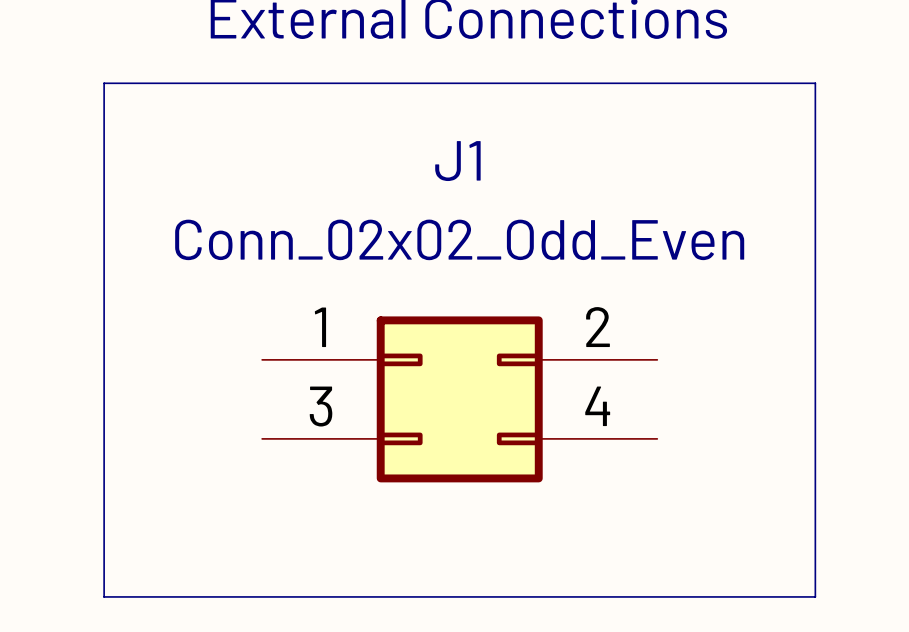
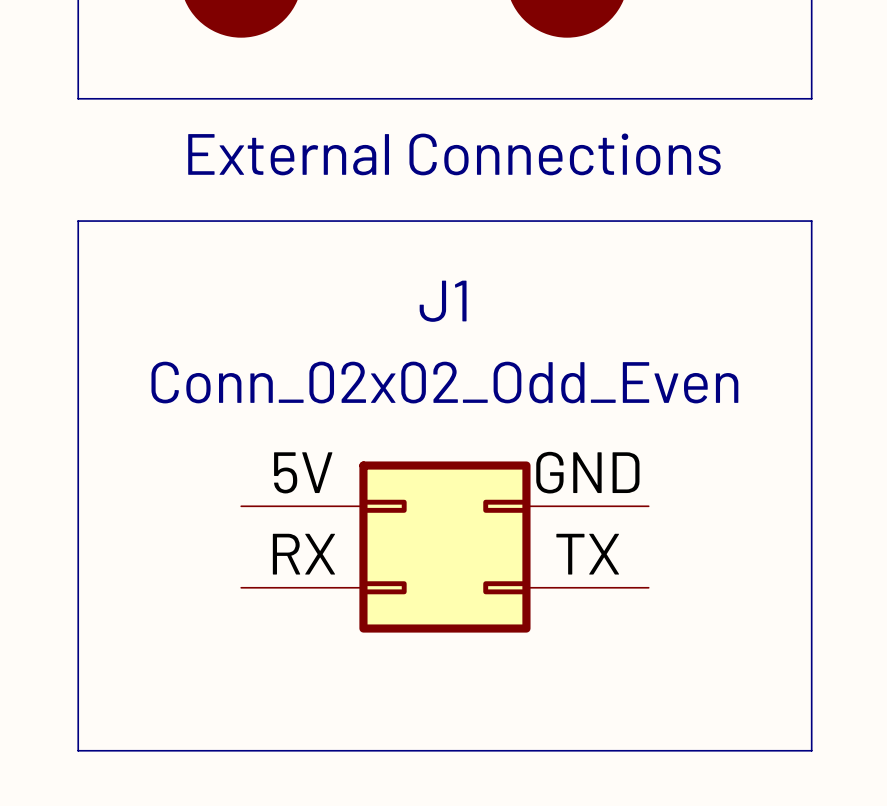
J1 pin number: 1 (320, 327) -> 5V (303, 472)
J1 pin number: 2 (598, 327) -> GND (587, 472)
J1 pin number: 3 (321, 406) -> RX (303, 554)
J1 pin number: 4 (597, 406) -> TX (587, 554)

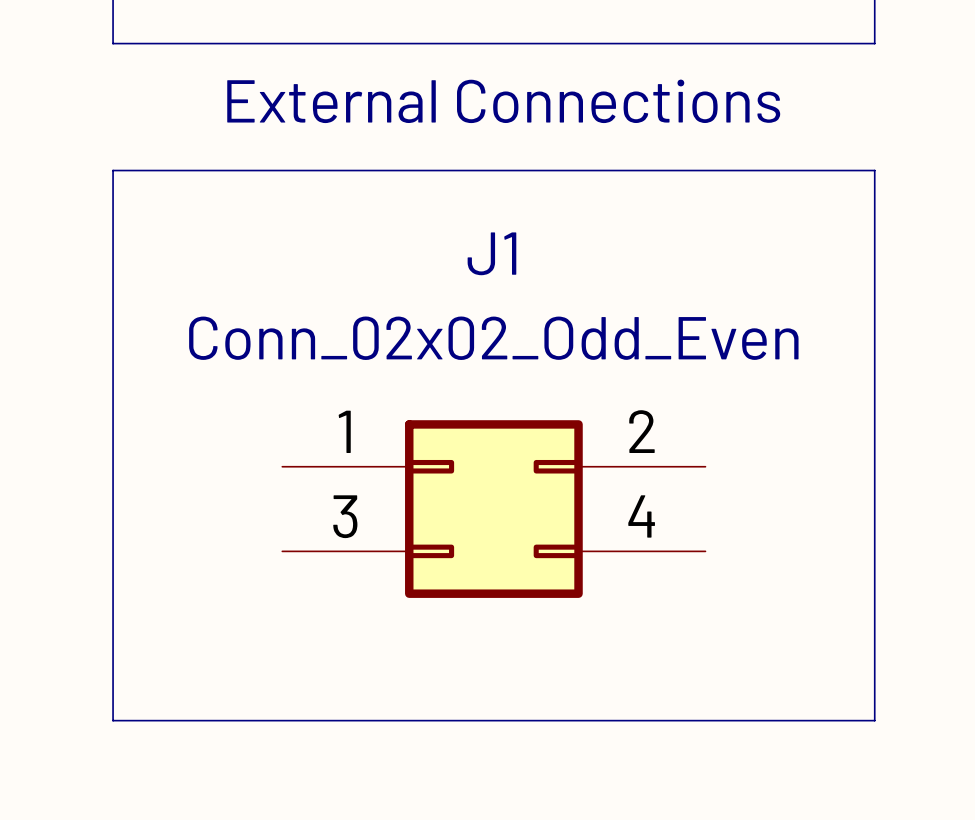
J1 pin number: 5V (303, 472) -> 1 (344, 431)
J1 pin number: GND (587, 472) -> 2 (641, 431)
J1 pin number: RX (303, 554) -> 3 (345, 516)
J1 pin number: TX (587, 554) -> 4 (641, 516)

